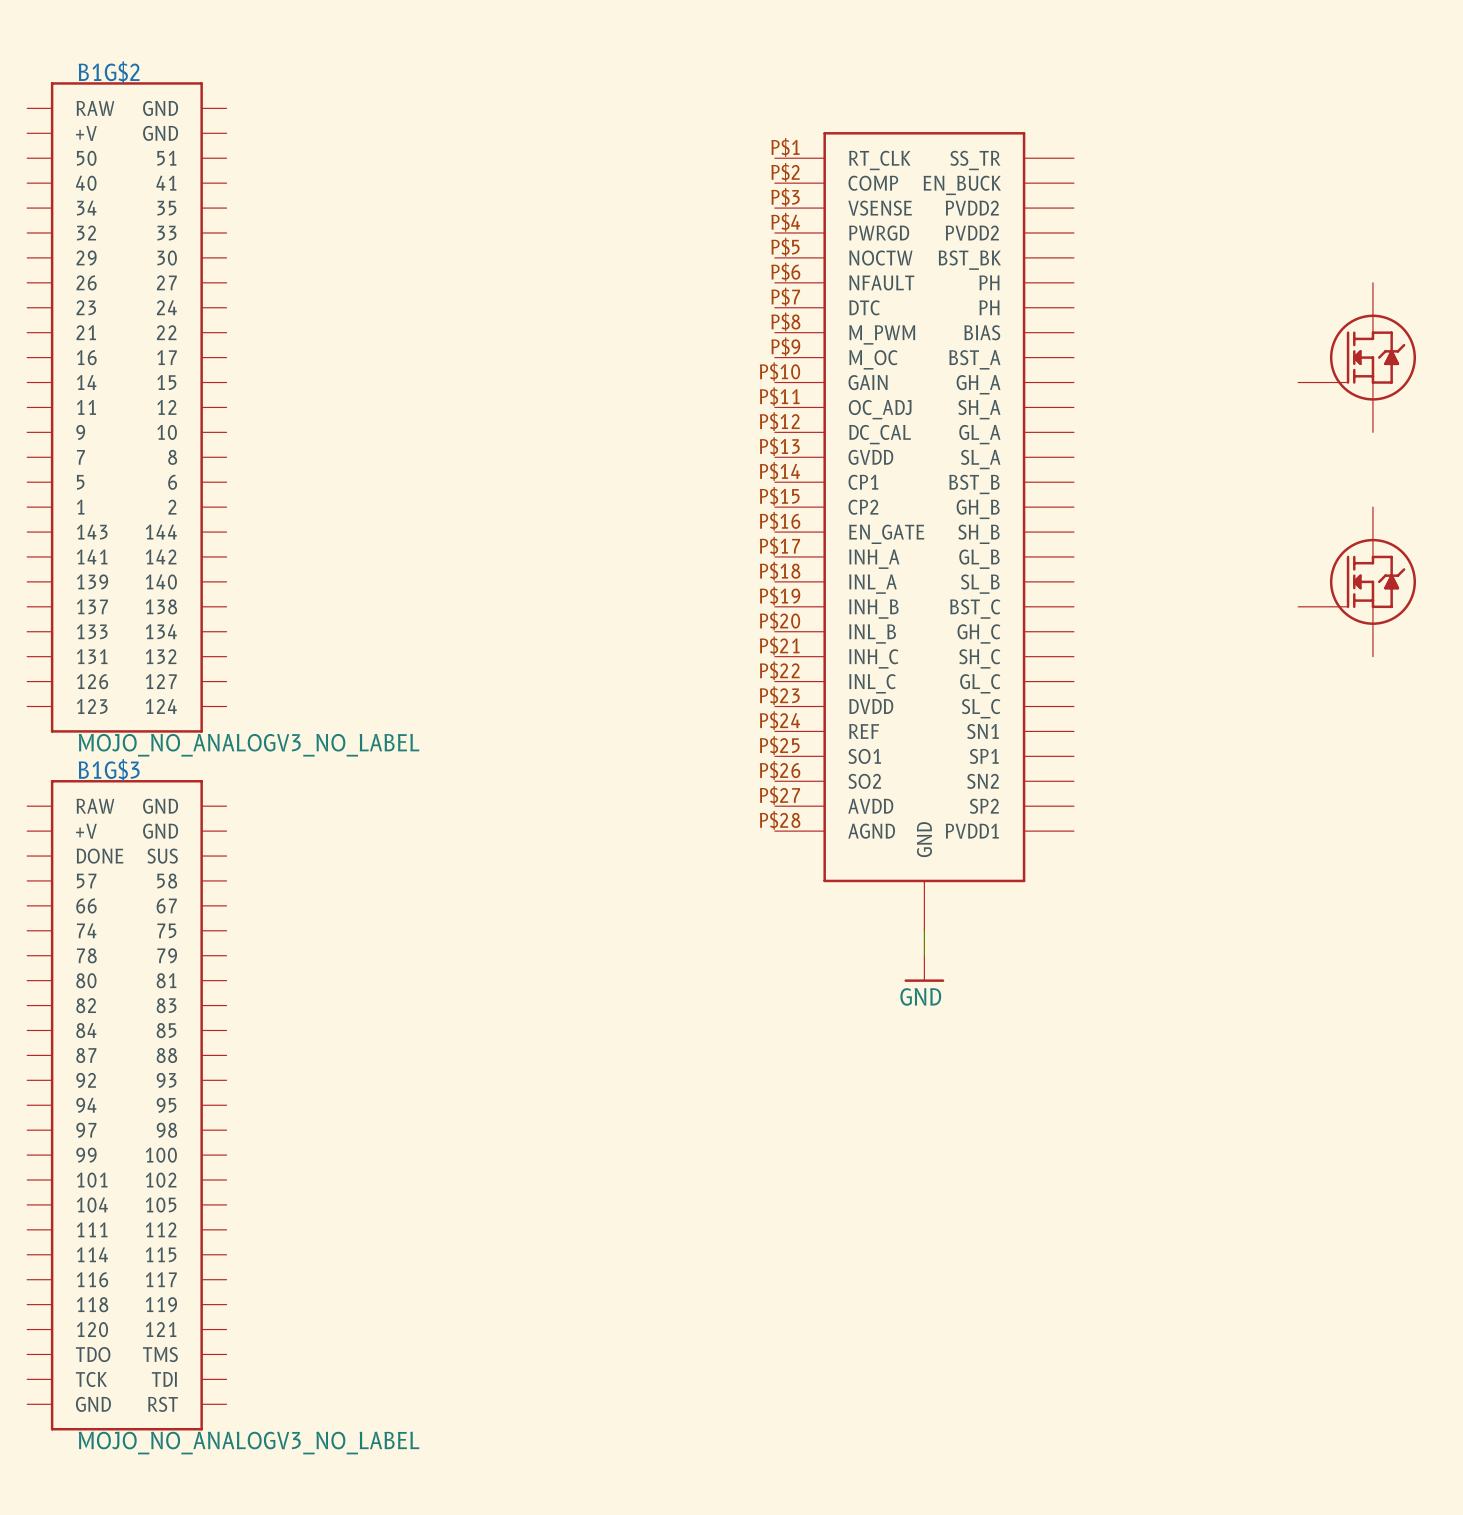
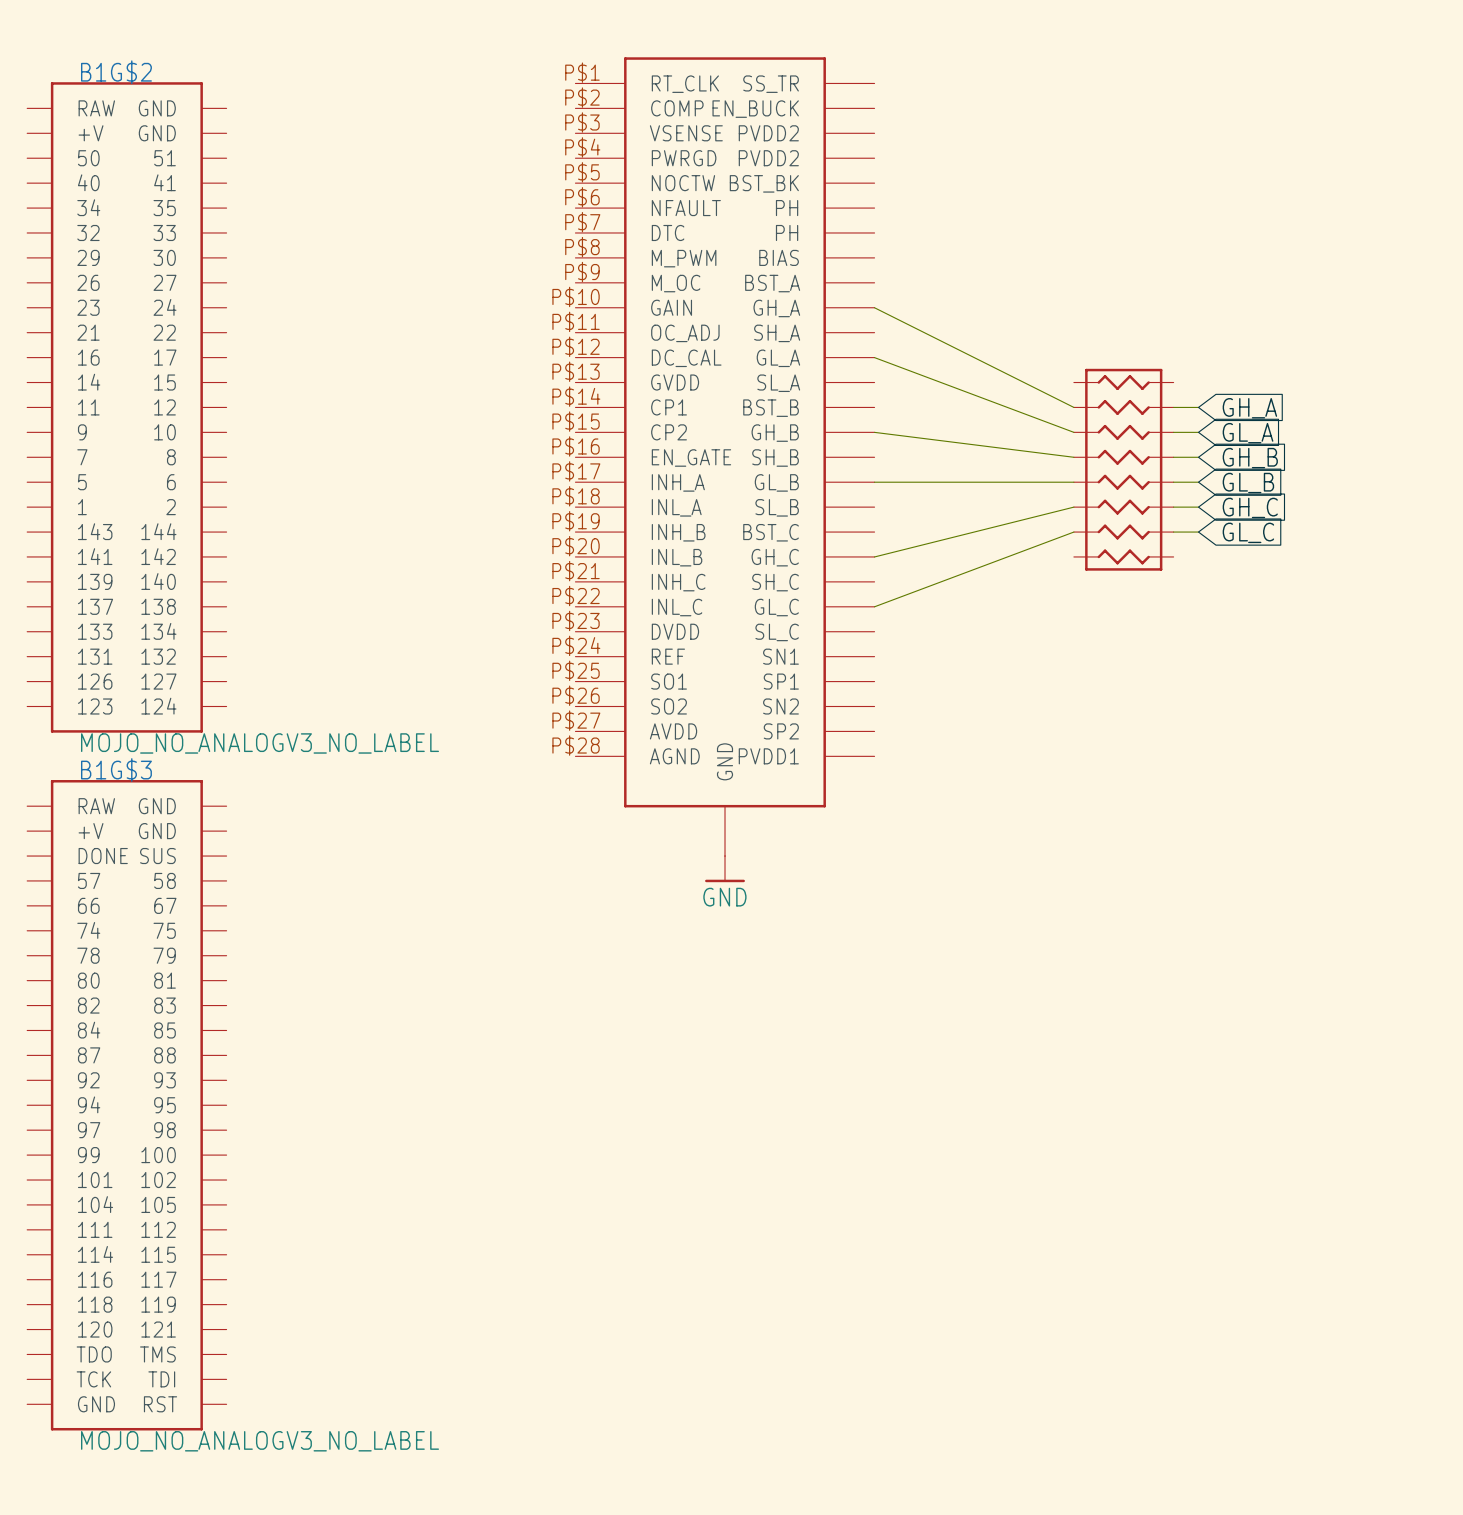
wire: none -> (874, 307) (1073, 407)
wire: none -> (874, 357) (1073, 432)
part: (1357, 357) -> none
wire: none -> (1173, 407) (1198, 407)
global label: none -> GH_A (1249, 408)
wire: none -> (874, 432) (1073, 457)
wire: none -> (1173, 432) (1198, 432)
global label: none -> GL_A (1248, 433)
wire: none -> (1173, 457) (1198, 457)
global label: none -> GH_B (1250, 458)
part: none -> (1123, 469)
wire: none -> (874, 482) (1073, 482)
wire: none -> (1173, 482) (1198, 482)
global label: none -> GL_B (1248, 483)
wire: none -> (1073, 507) (874, 556)
wire: none -> (1173, 507) (1198, 507)
global label: none -> GH_C (1250, 507)
part position: (924, 531) -> (725, 456)
wire: none -> (1073, 532) (874, 606)
wire: none -> (1173, 532) (1198, 532)
global label: none -> GL_C (1248, 532)
part: (1357, 581) -> none
wire: (924, 930) (924, 955) -> none
power symbol position: GND (924, 968) -> GND (725, 869)

